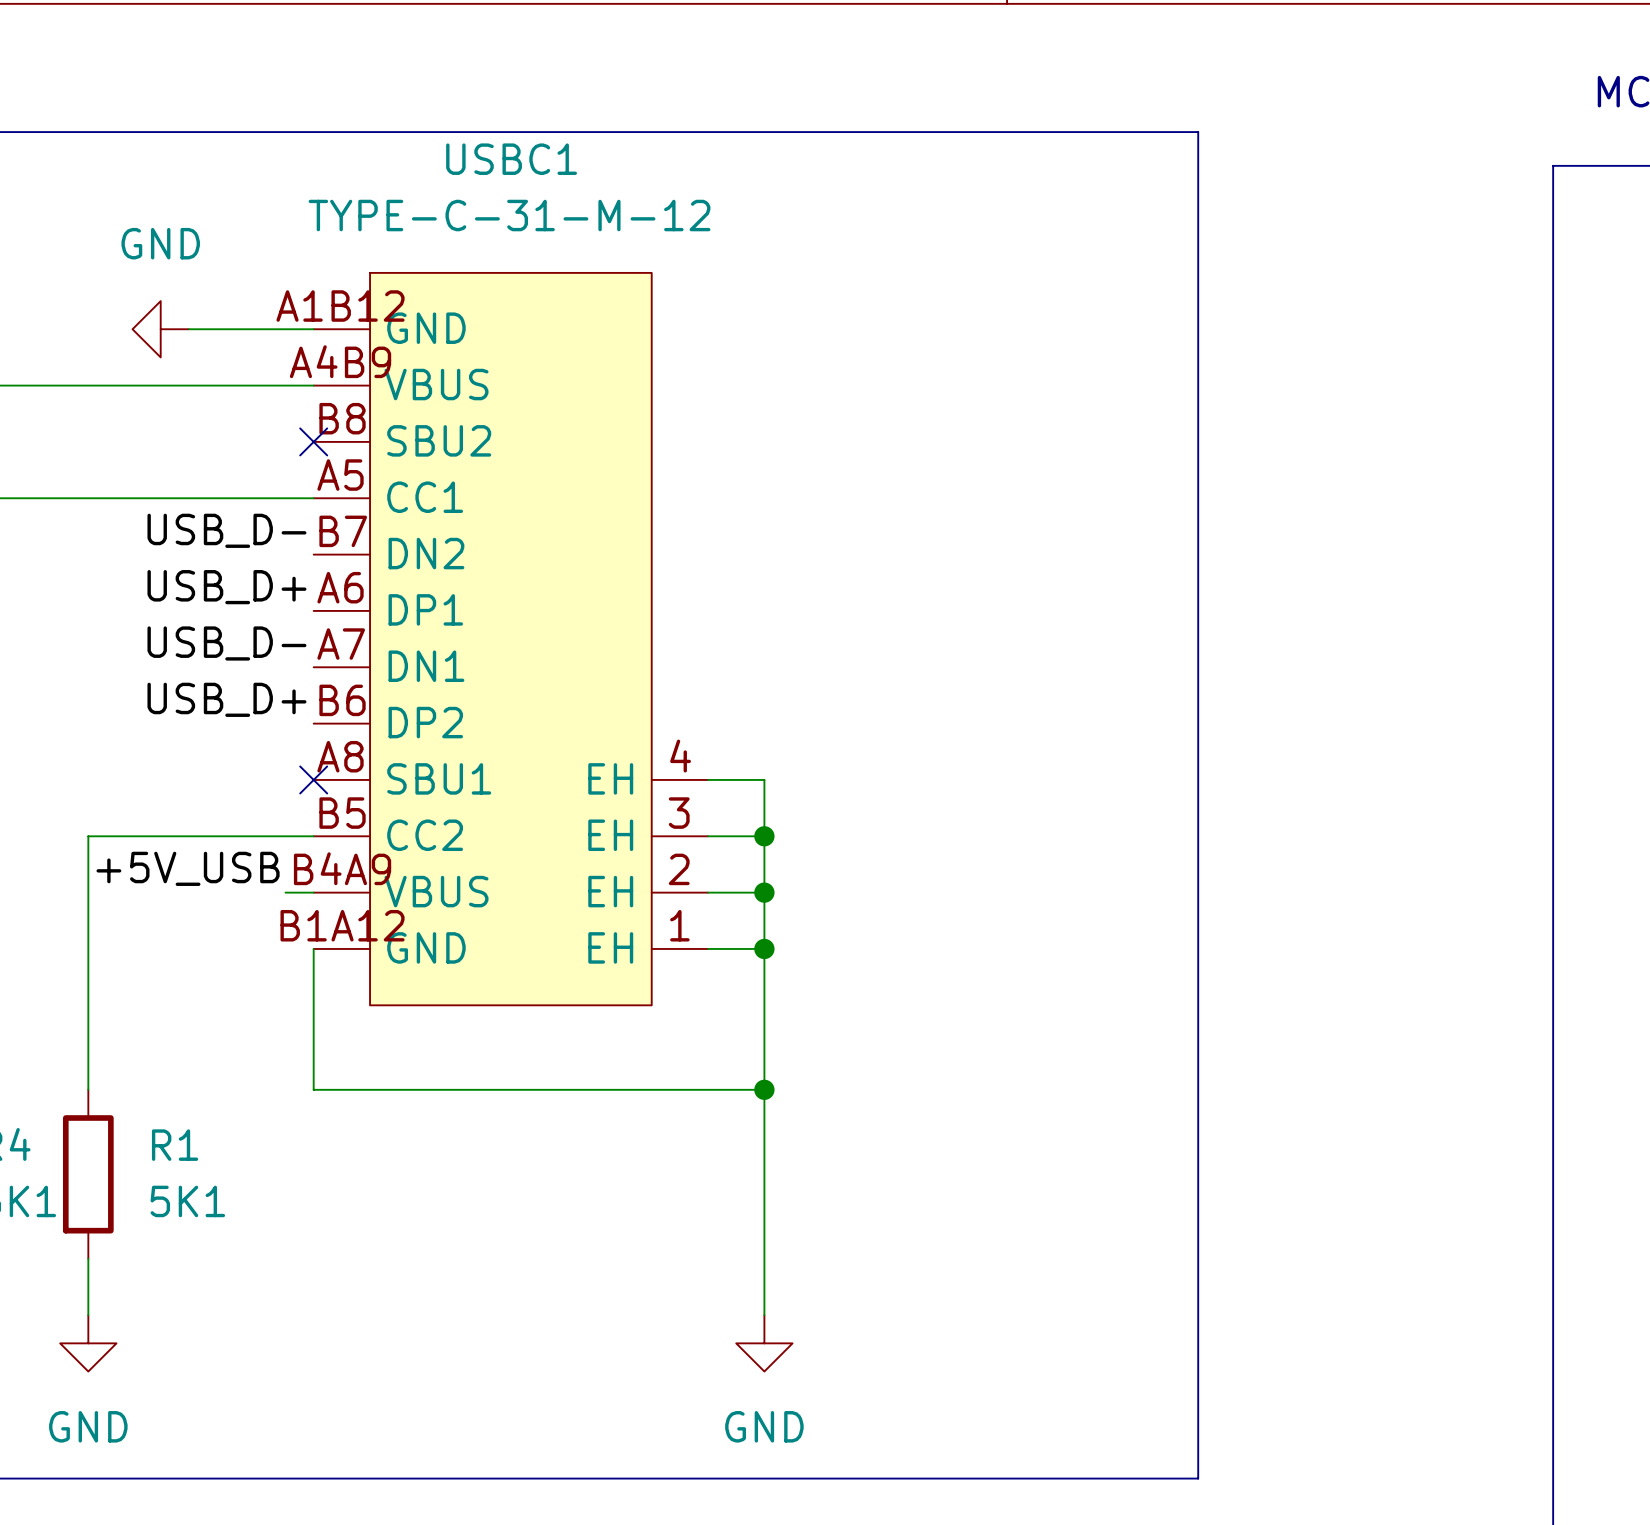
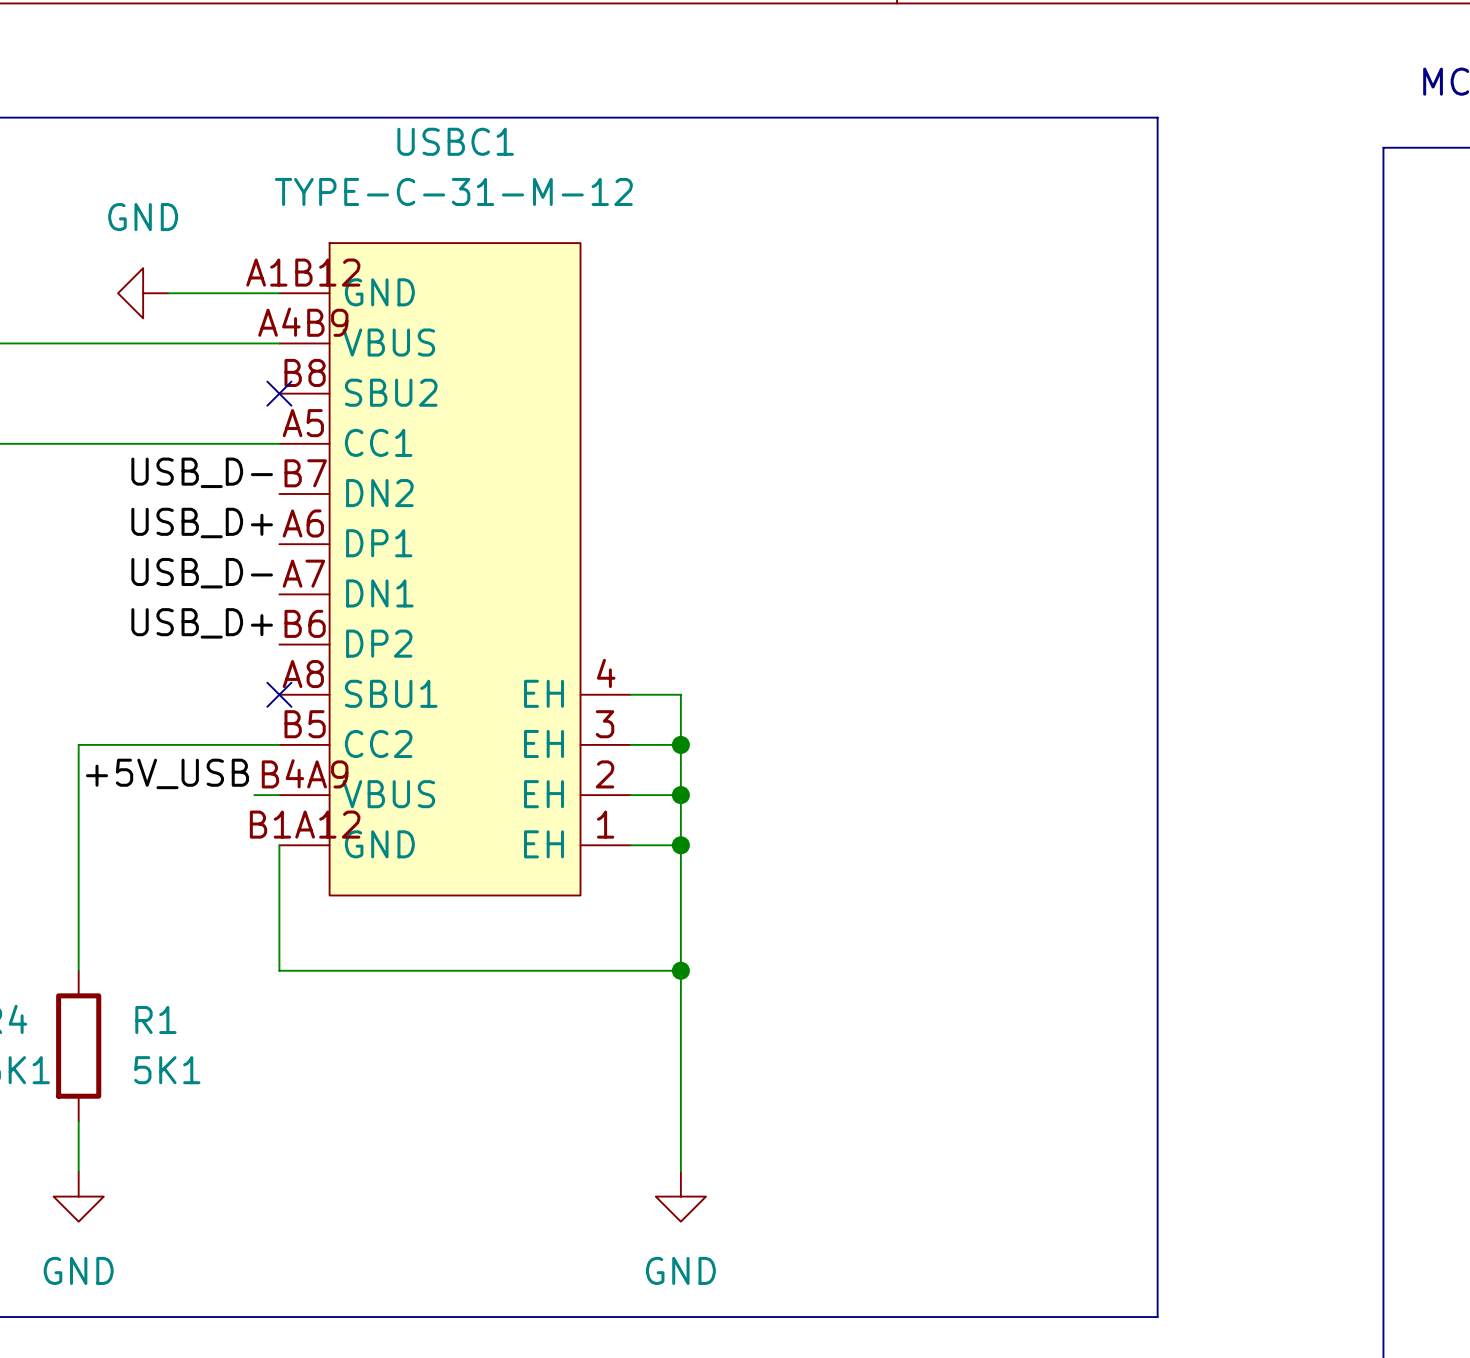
line: (1198, 132) (1198, 1478) -> (1067, 117) (1157, 117) (1157, 1317) (1067, 1317)

